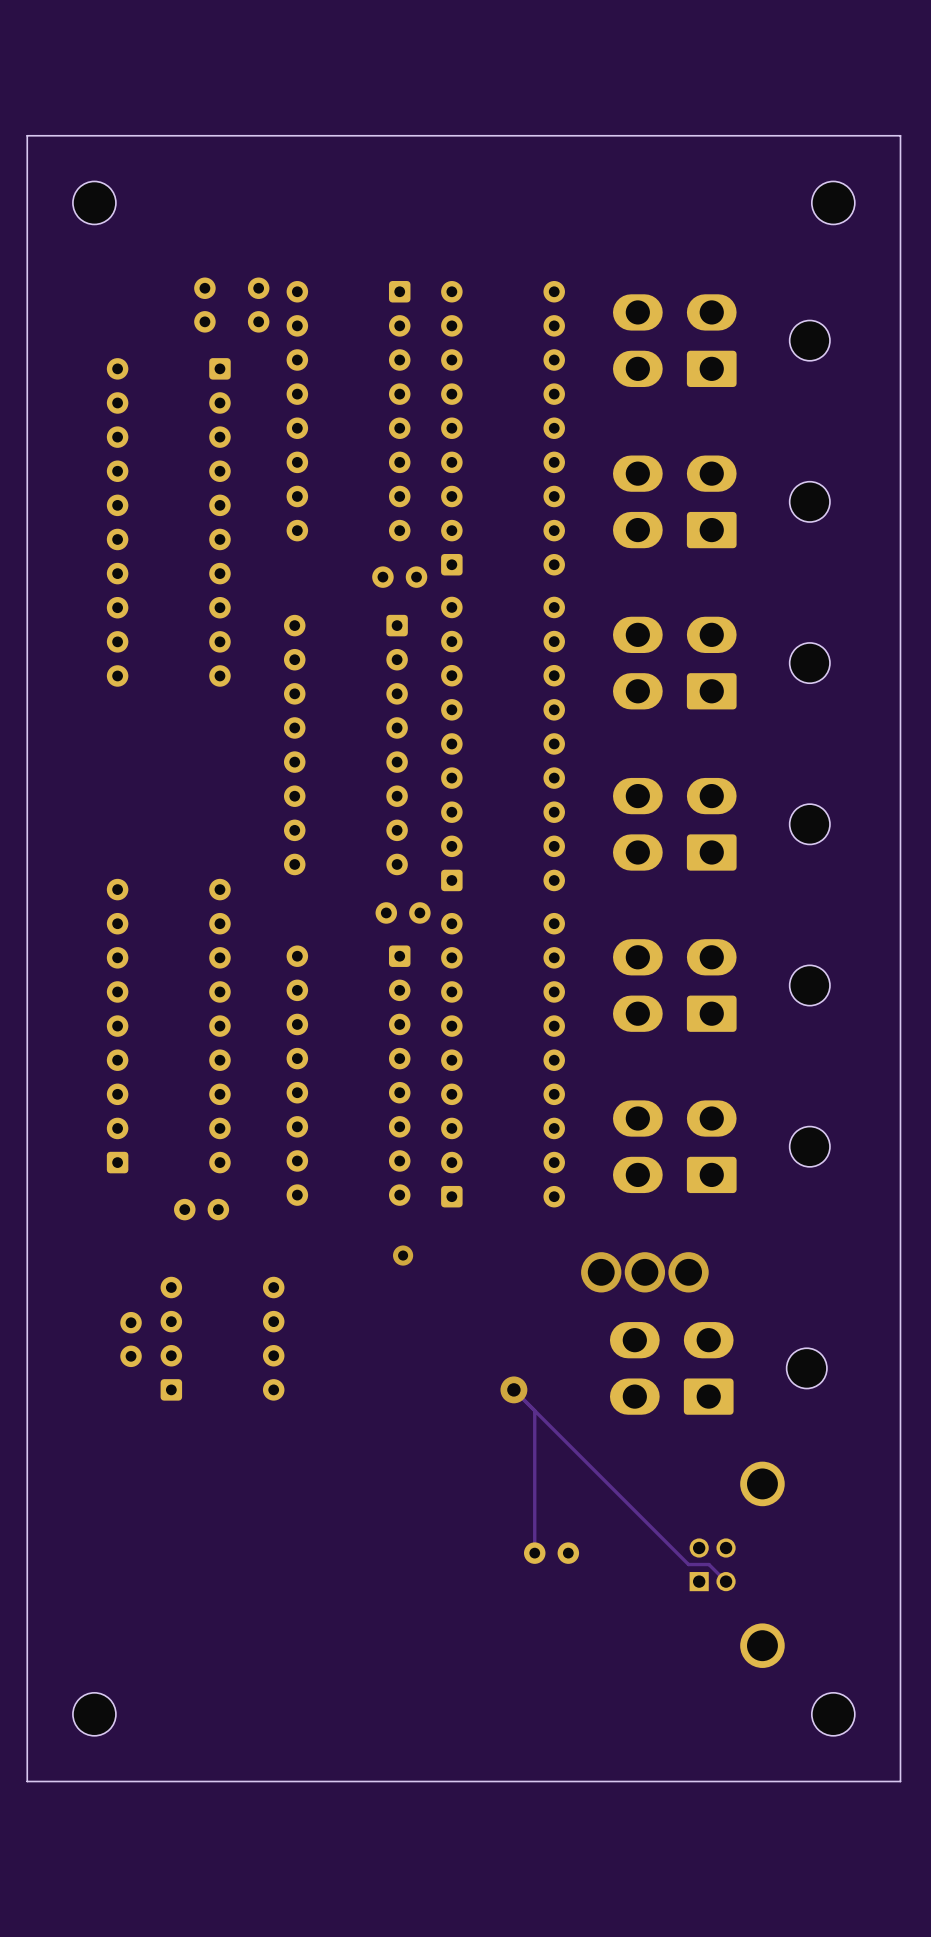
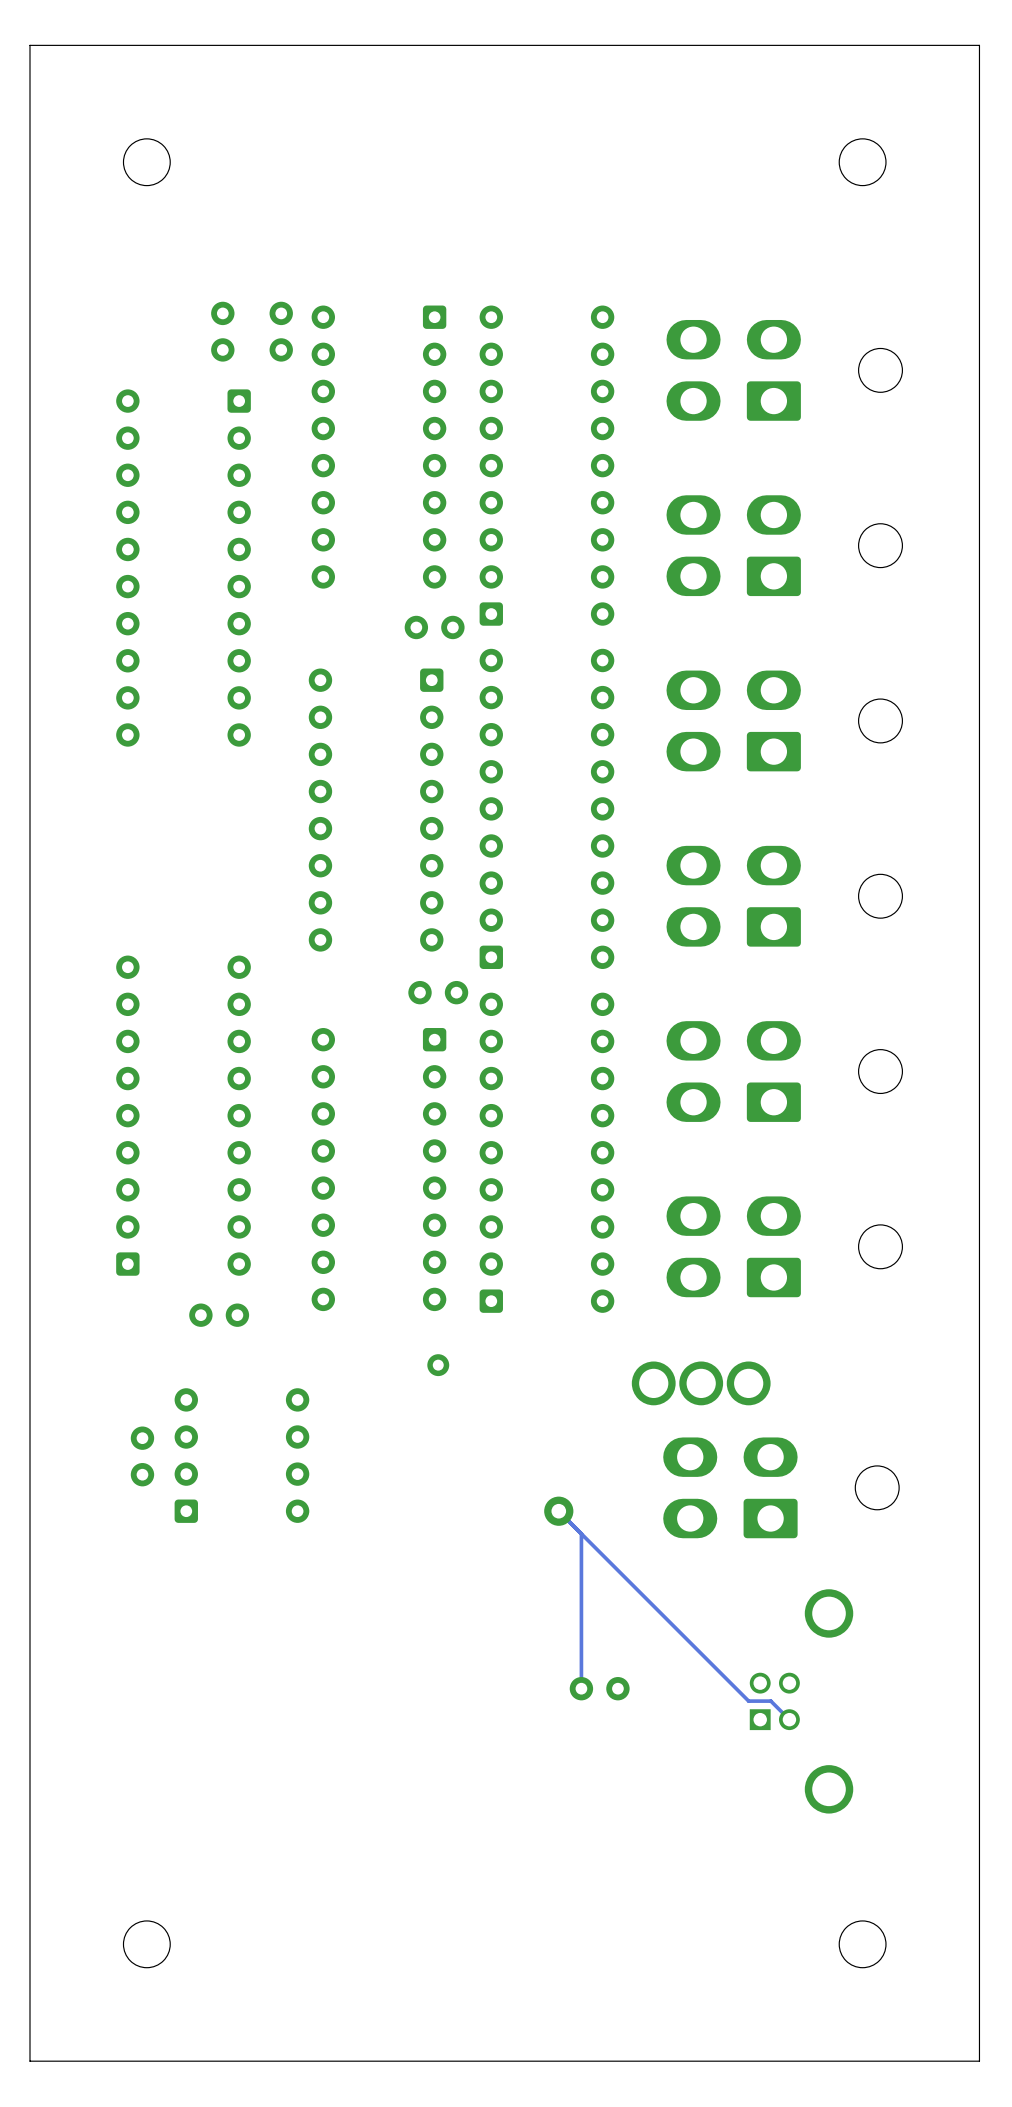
round board edge: none -> [123, 138, 171, 186]
round board edge: none -> [838, 138, 887, 186]
board edge: (900, 135) (27, 135) (27, 1781) (900, 1781) (900, 135) -> (979, 45) (979, 2061) (29, 2061) (29, 45) (979, 45)
part: (94, 202) -> none
part: (833, 202) -> none
part: (94, 1714) -> none
part: (833, 1714) -> none
round board edge: none -> [123, 1920, 171, 1969]
round board edge: none -> [838, 1920, 887, 1969]

